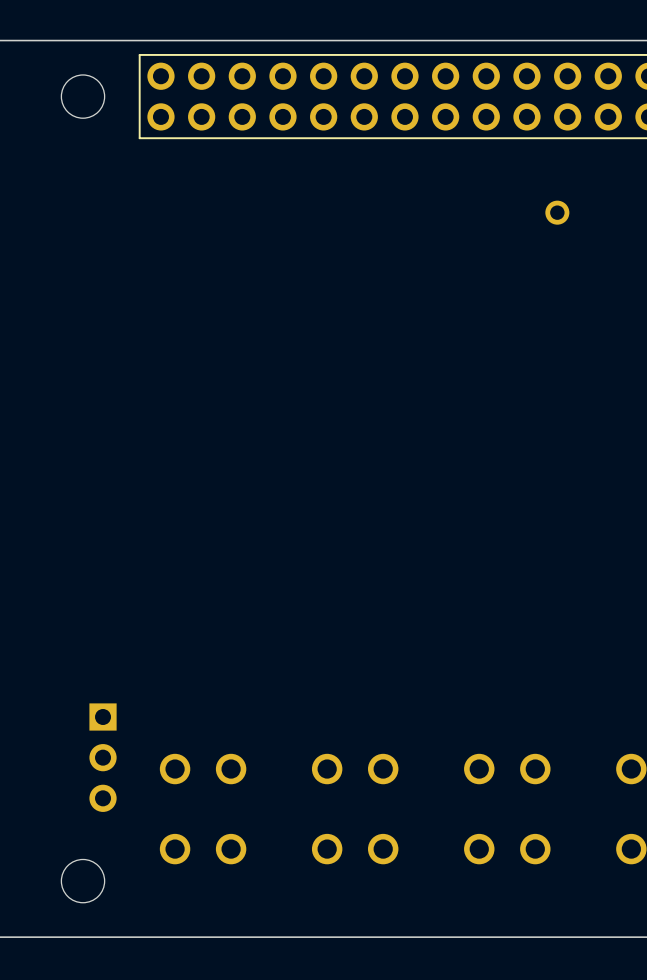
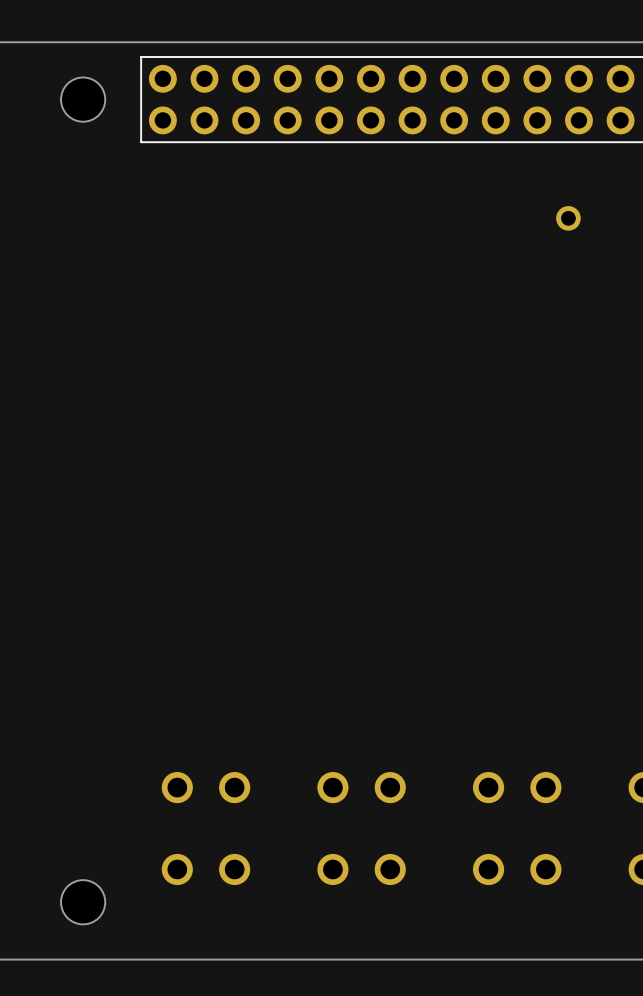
part: (103, 757) -> none

